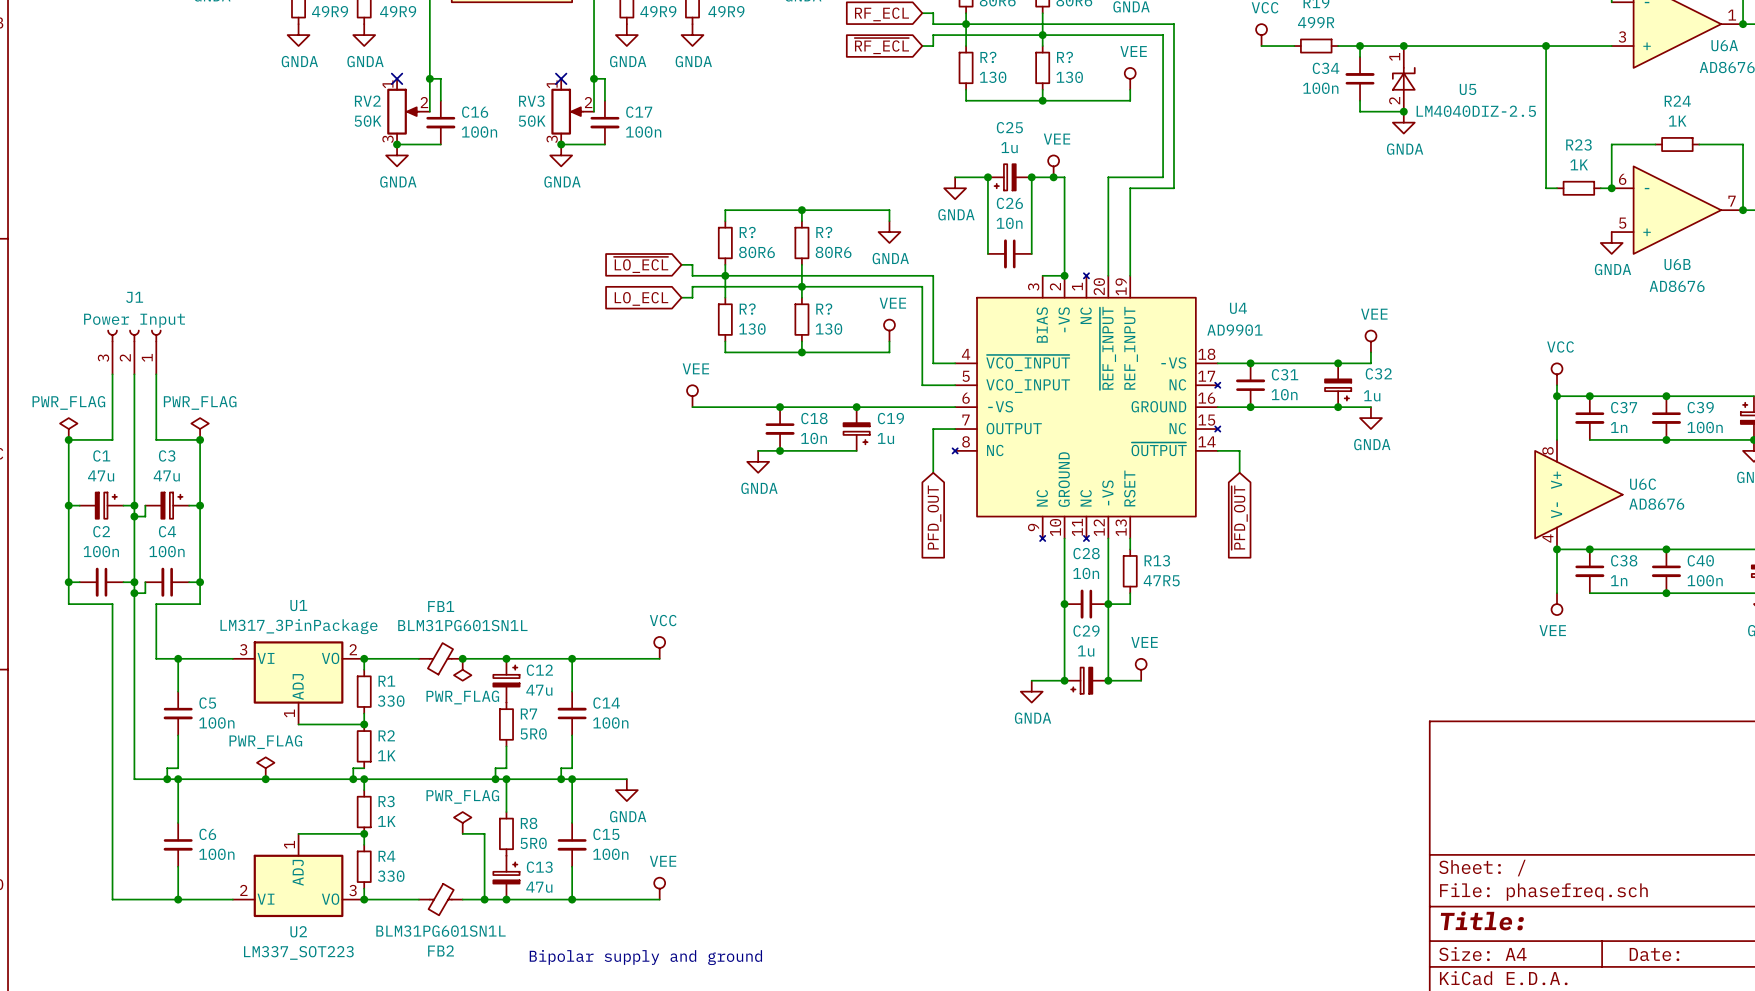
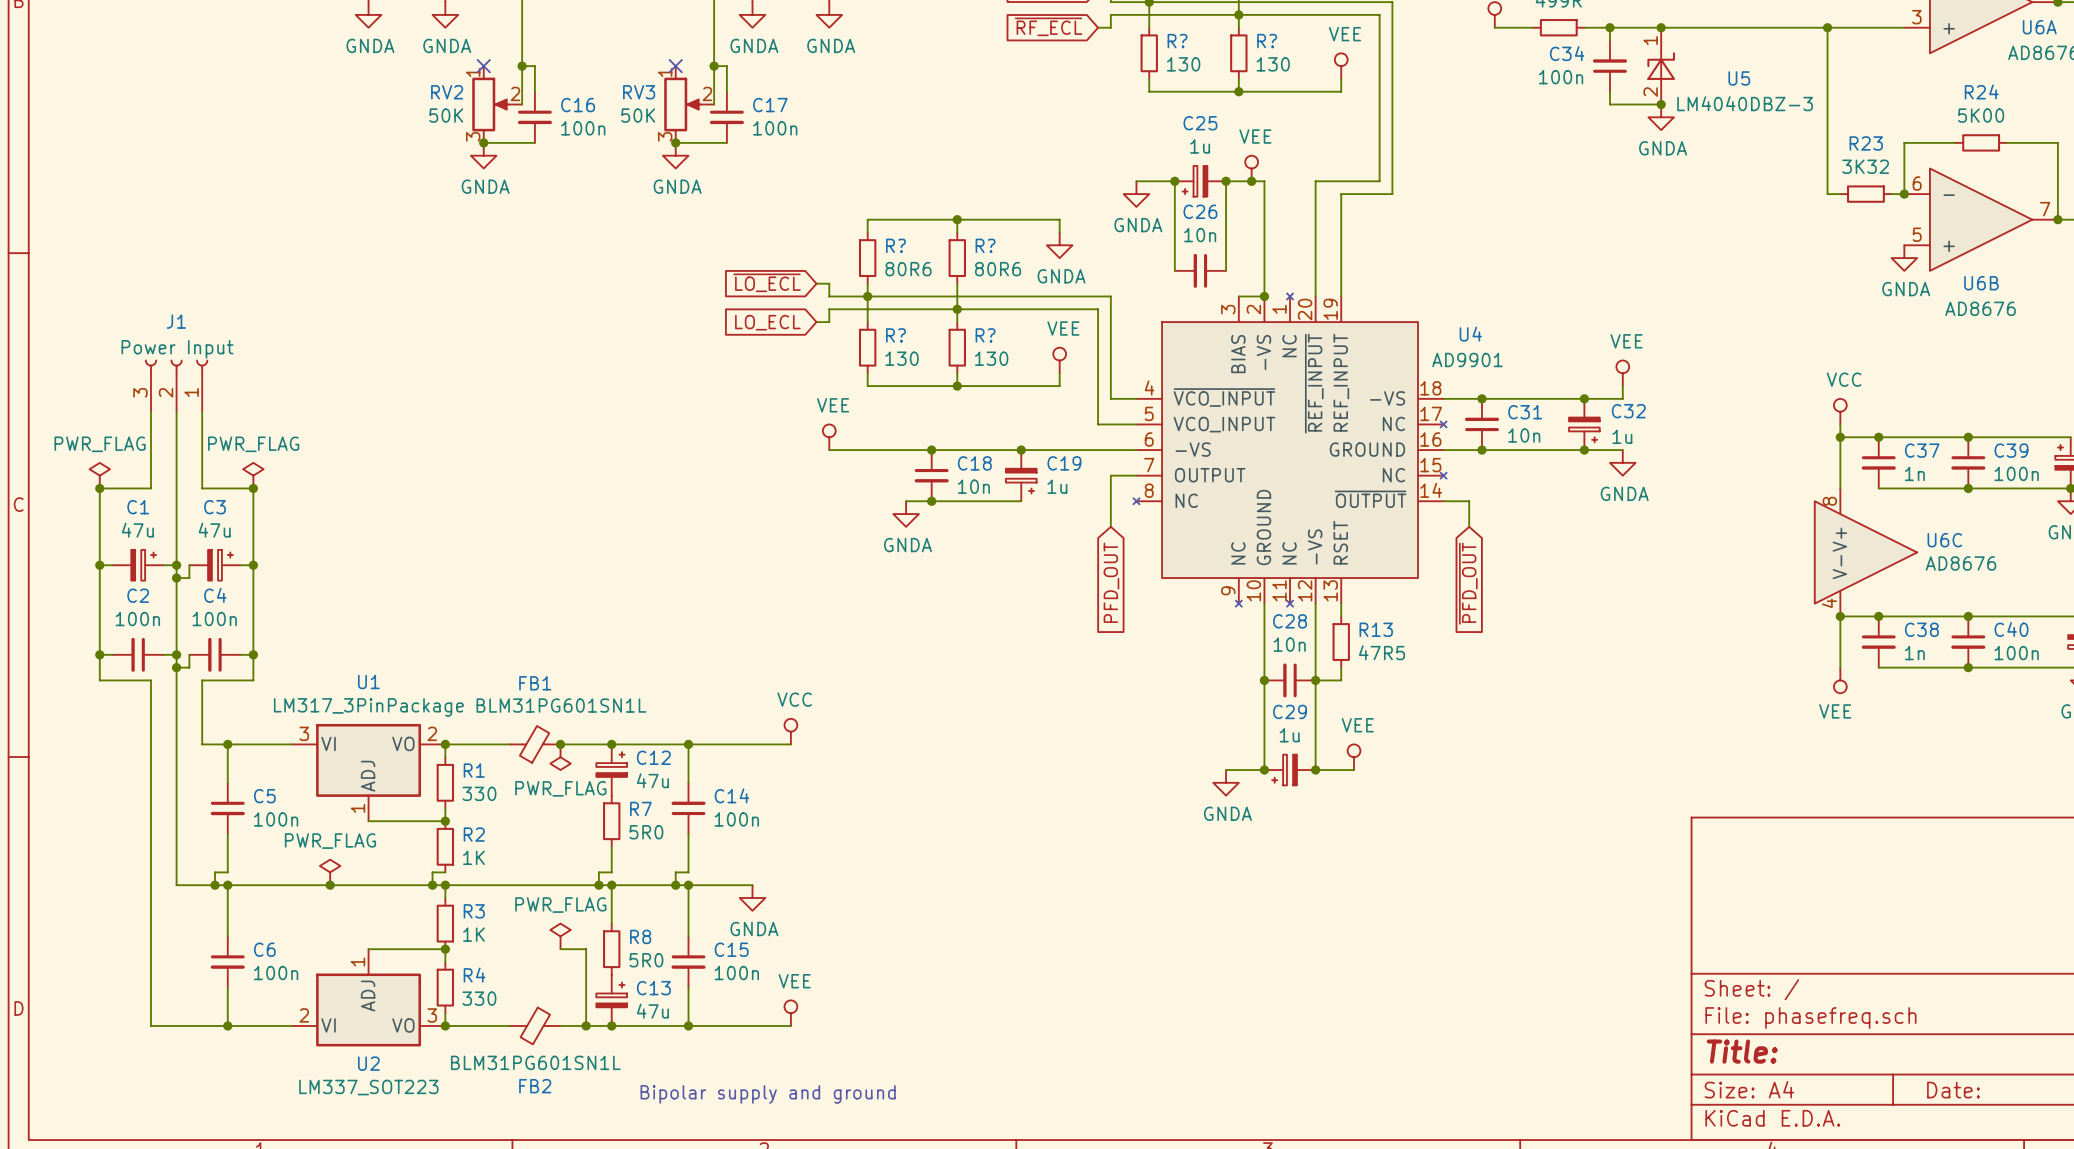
U5 value: LM4040DIZ-2.5 (1476, 111) -> LM4040DBZ-3 (1745, 103)
R24 value: 1K (1677, 121) -> 5K00 (1981, 115)
R23 value: 1K (1579, 164) -> 3K32 (1865, 166)

